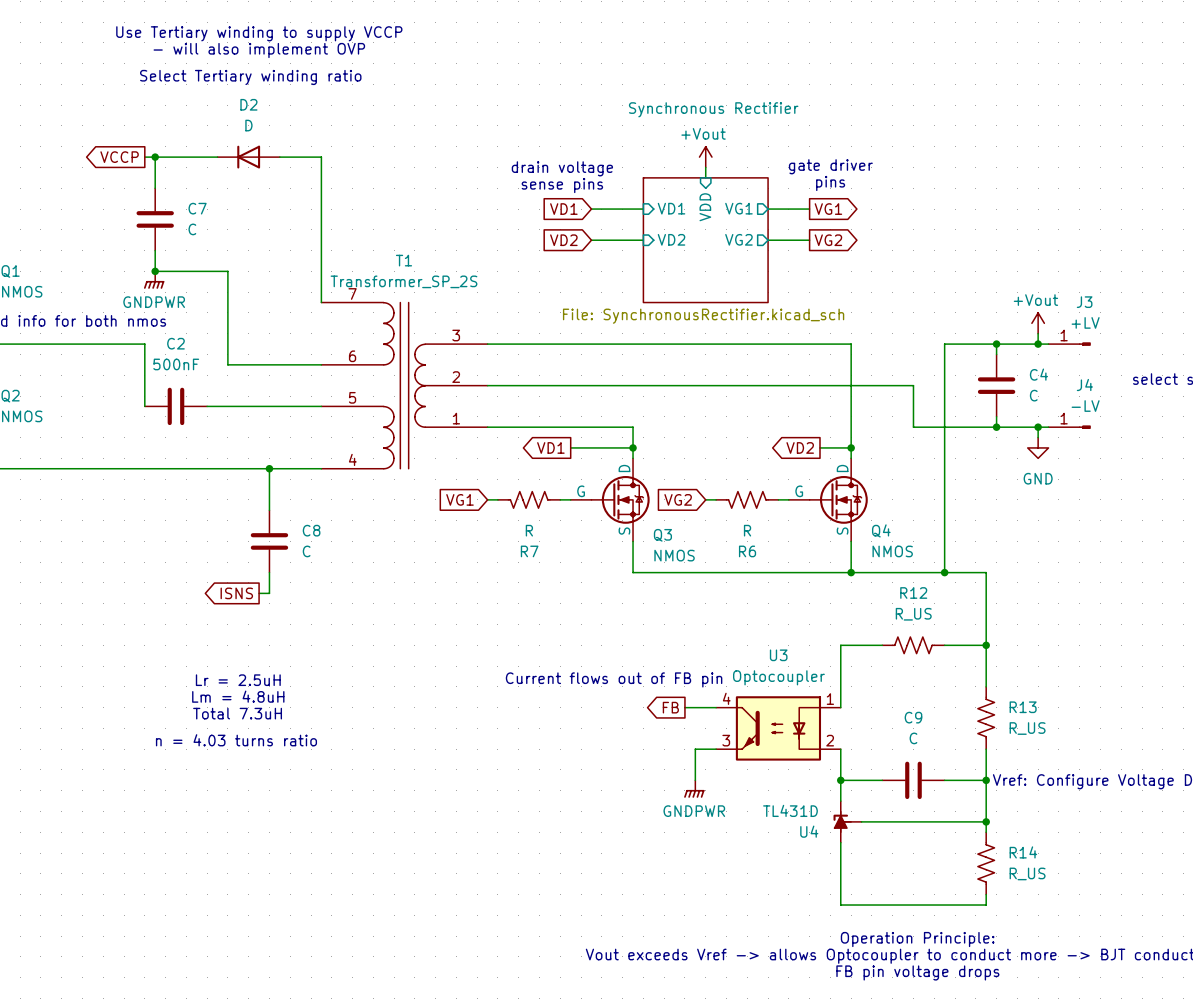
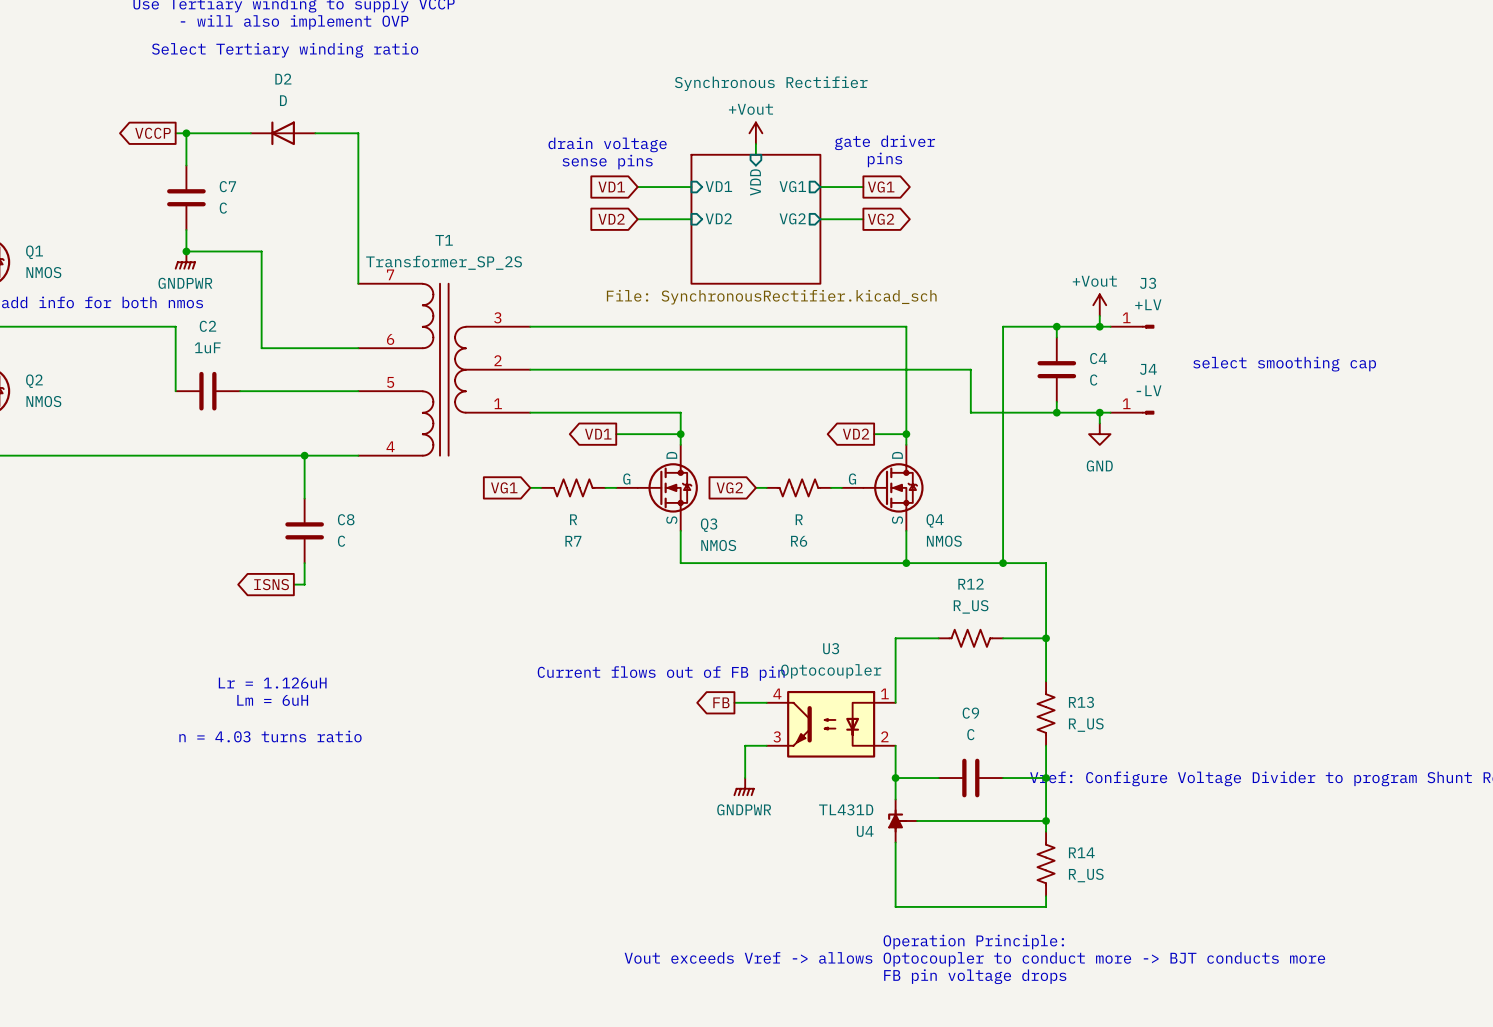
C2 value: 500nF (176, 364) -> 1uF (207, 347)
text: Lr = 2.5uH (238, 680) -> none
text: none -> Lr = 1.126uH (272, 683)
text: Lm = 4.8uH (238, 696) -> none
text: none -> Lm = 6uH (272, 700)
text: Total 7.3uH (237, 713) -> none

